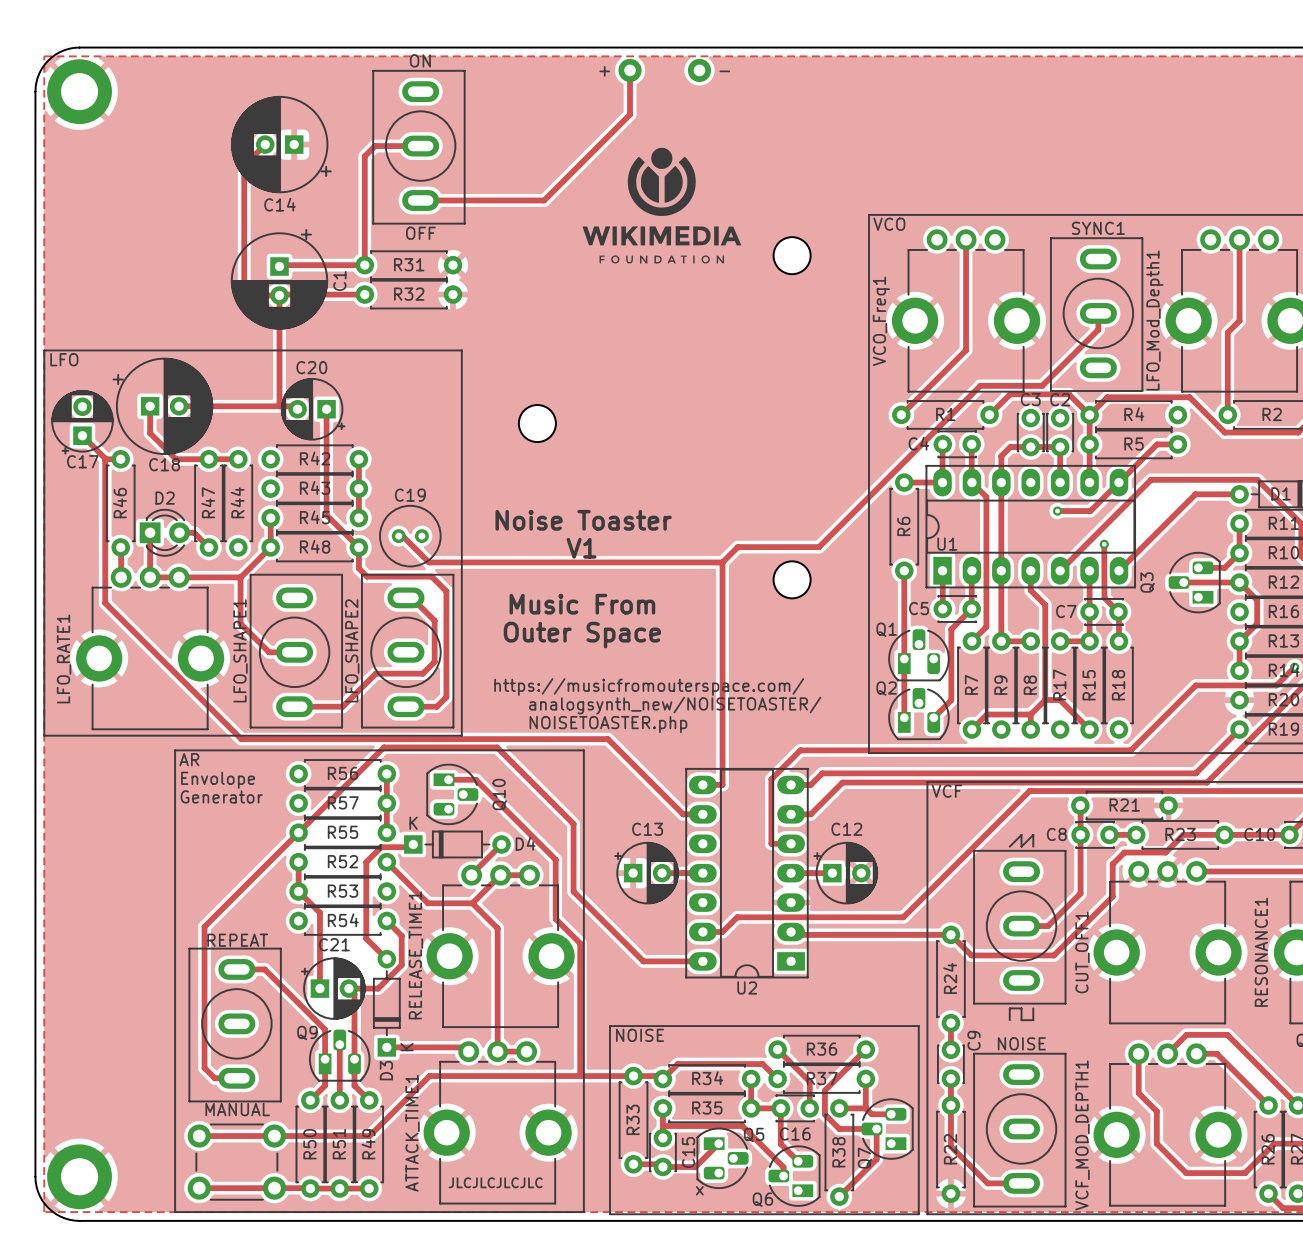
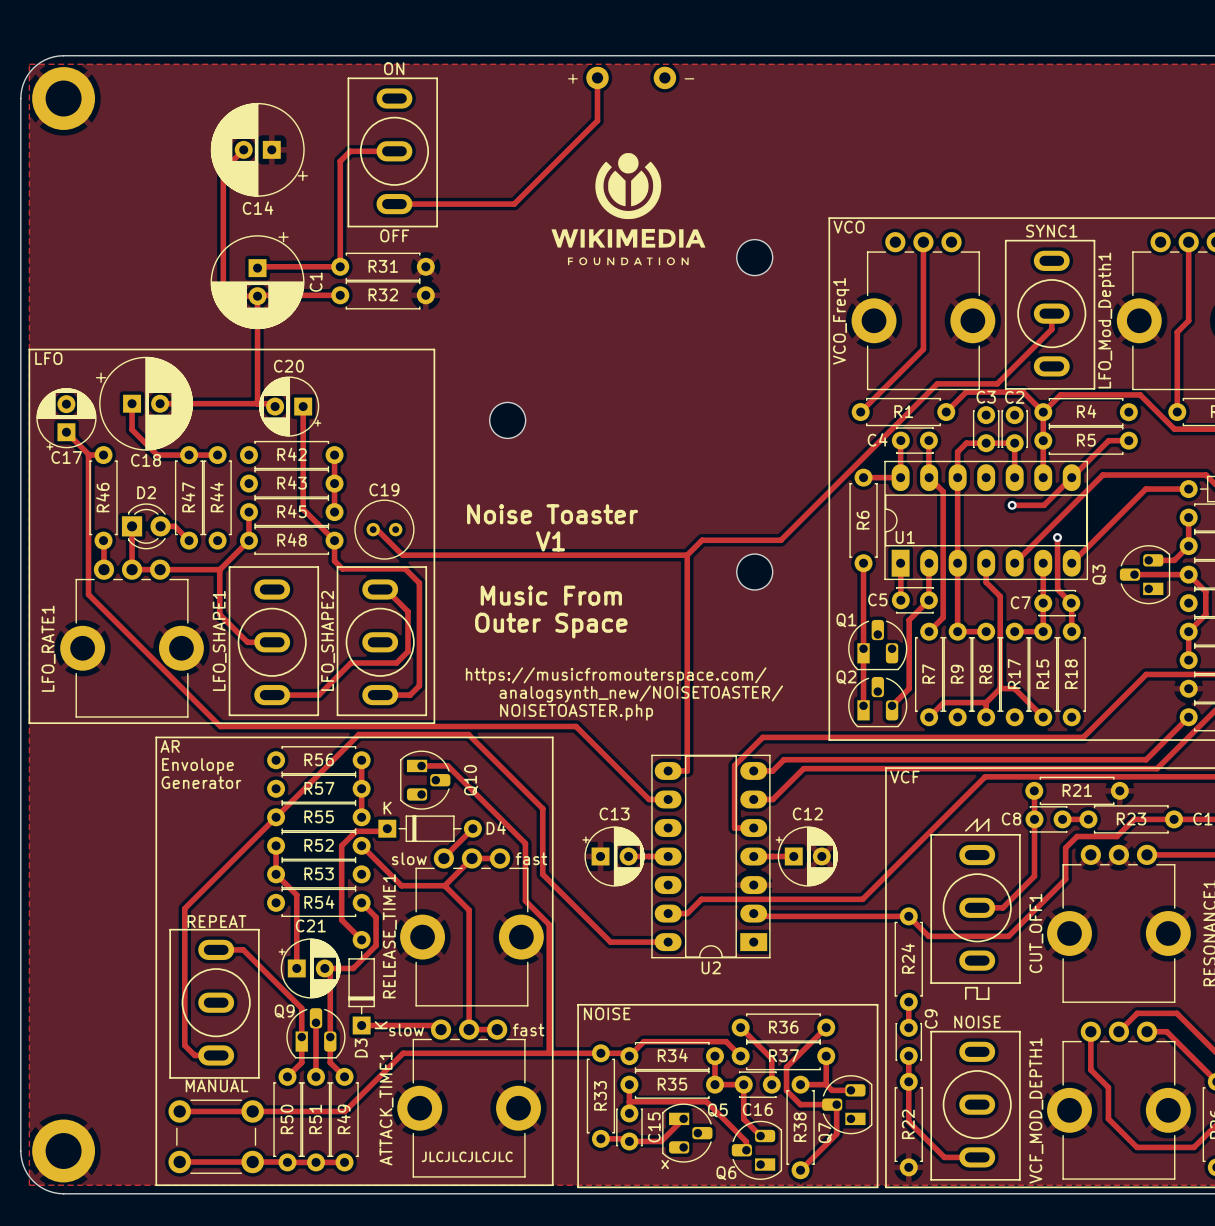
text: none -> slow (409, 858)
text: none -> fast (531, 858)
text: none -> slow (406, 1029)
text: none -> fast (528, 1029)

